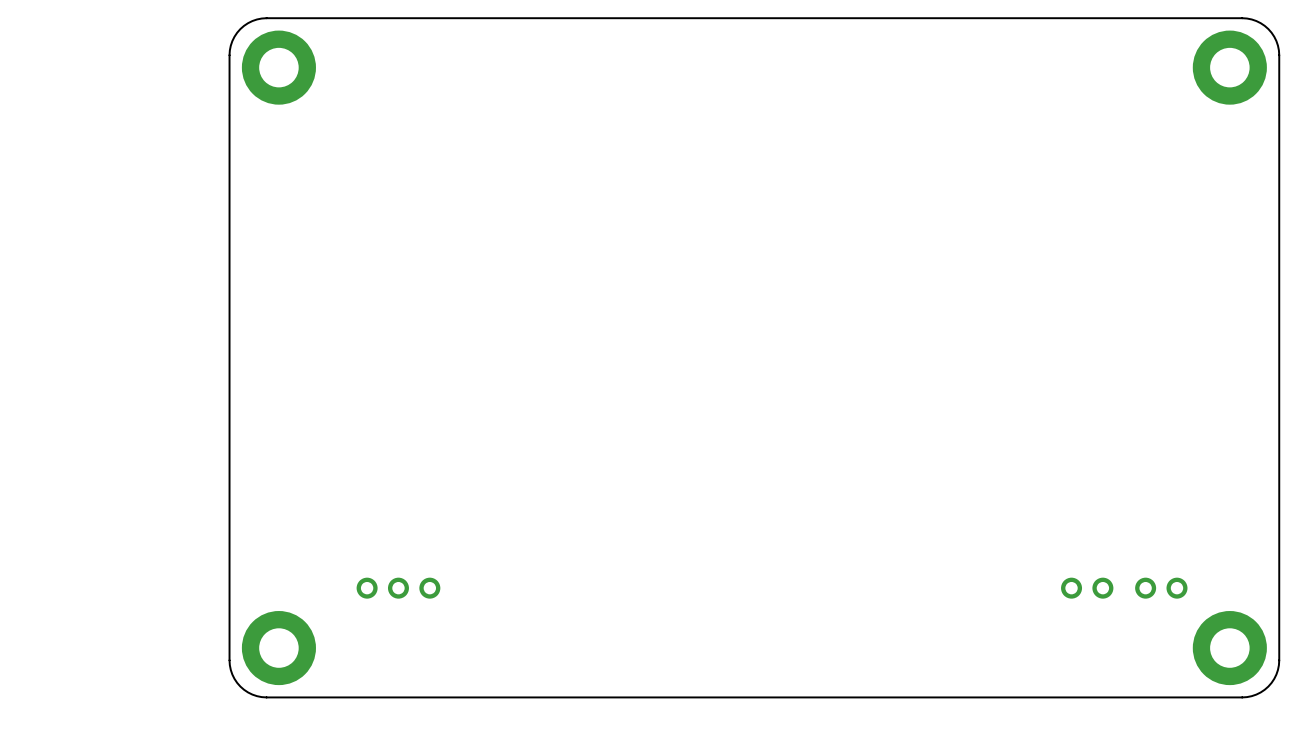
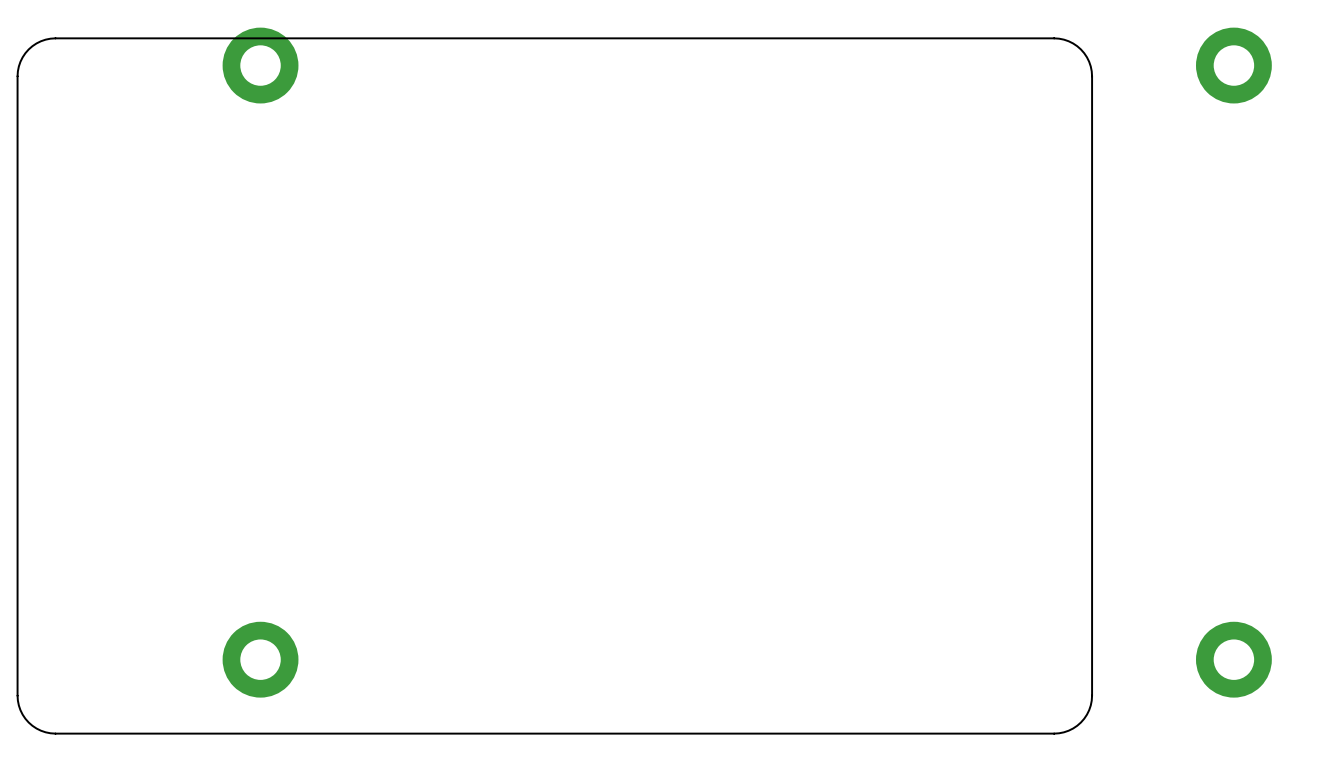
board edge: (1242, 18) (266, 18) (248, 23) (234, 36) (229, 55) (229, 660) (234, 678) (248, 692) (266, 697) (1242, 697) (1260, 692) (1274, 678) (1279, 660) (1279, 55) (1276, 41) (1268, 29) (1256, 21) (1242, 18) -> (1054, 38) (55, 38) (36, 43) (22, 57) (17, 76) (17, 695) (22, 714) (36, 728) (55, 733) (1054, 733) (1073, 728) (1086, 714) (1092, 695) (1092, 76) (1089, 61) (1080, 49) (1068, 41) (1054, 38)
part: (398, 588) -> none
part: (1087, 588) -> none
part: (1161, 588) -> none

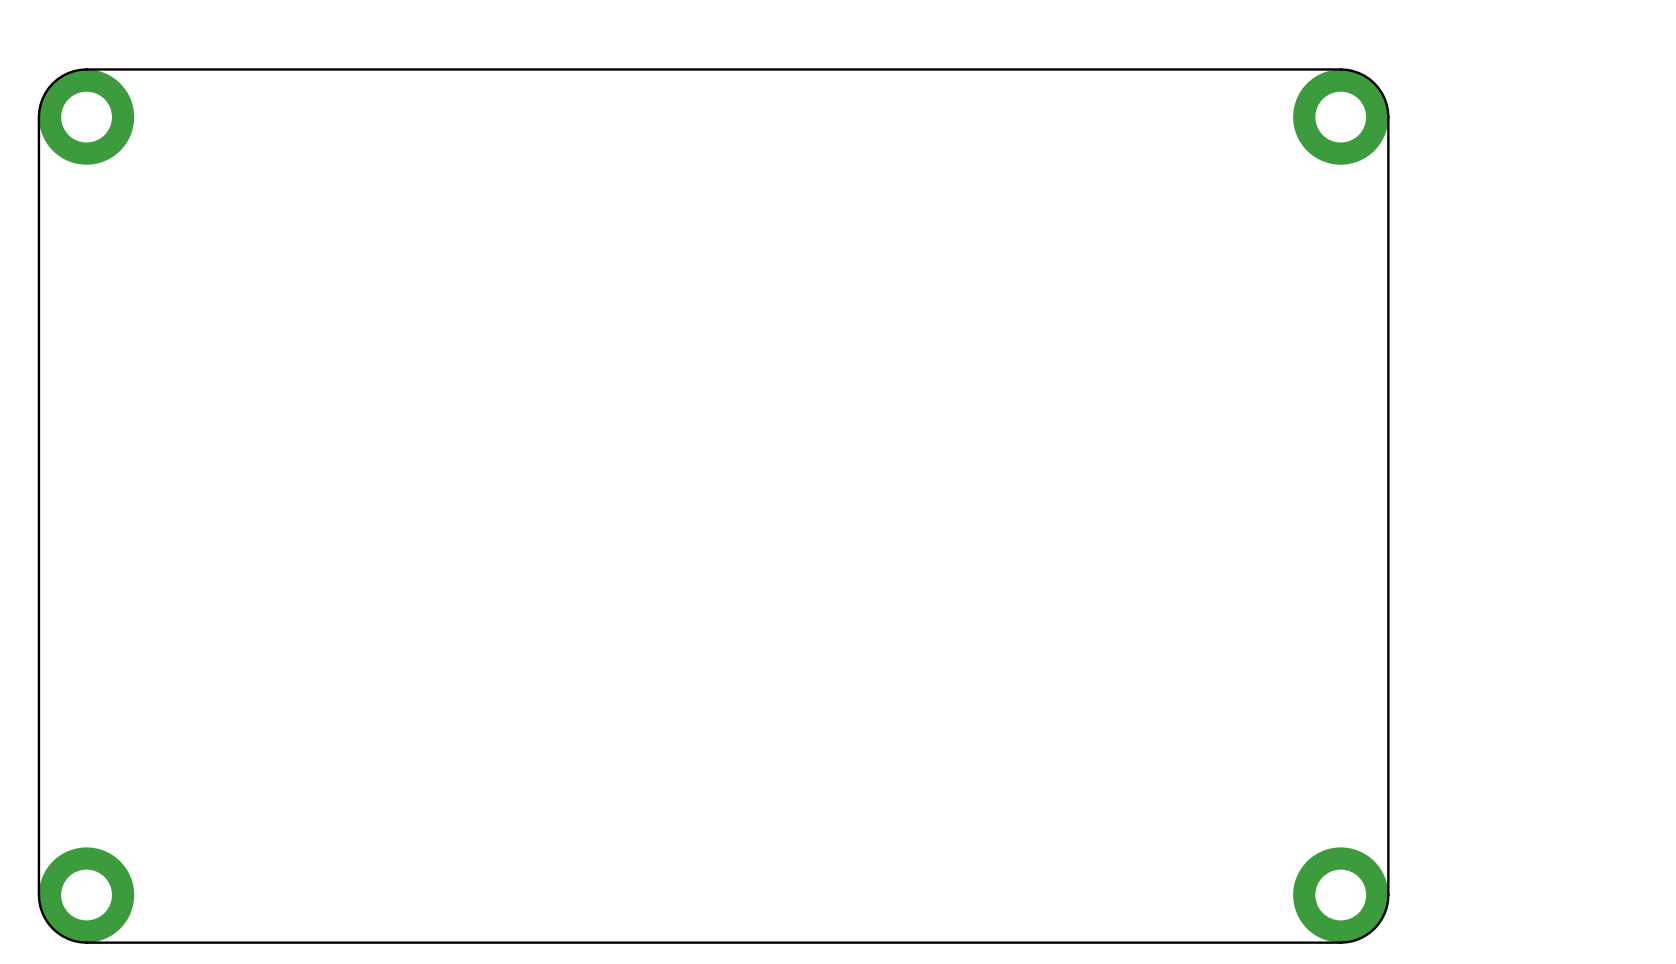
part position: (260, 65) -> (86, 117)
part position: (1233, 65) -> (1340, 117)
part position: (260, 659) -> (86, 895)
part position: (1233, 659) -> (1340, 895)

